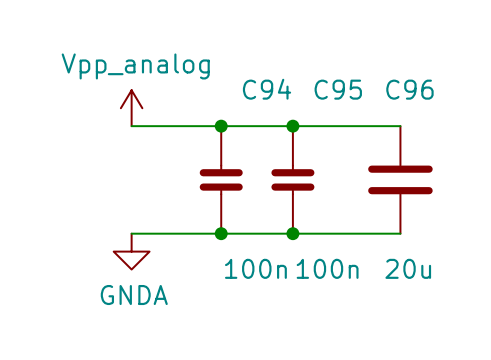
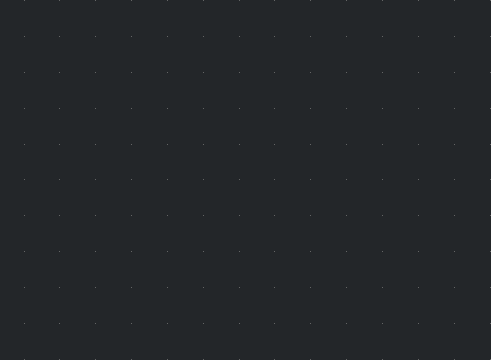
power symbol: Vpp_analog (131, 108) -> none
wire: (131, 126) (400, 126) -> none
junction: (221, 126) -> none
junction: (292, 126) -> none
C94: 100n (221, 179) -> none
C95: 100n (292, 179) -> none
C96: 20u (400, 179) -> none
wire: (131, 233) (400, 233) -> none
junction: (221, 233) -> none
junction: (292, 233) -> none
power symbol: GNDA (131, 251) -> none

